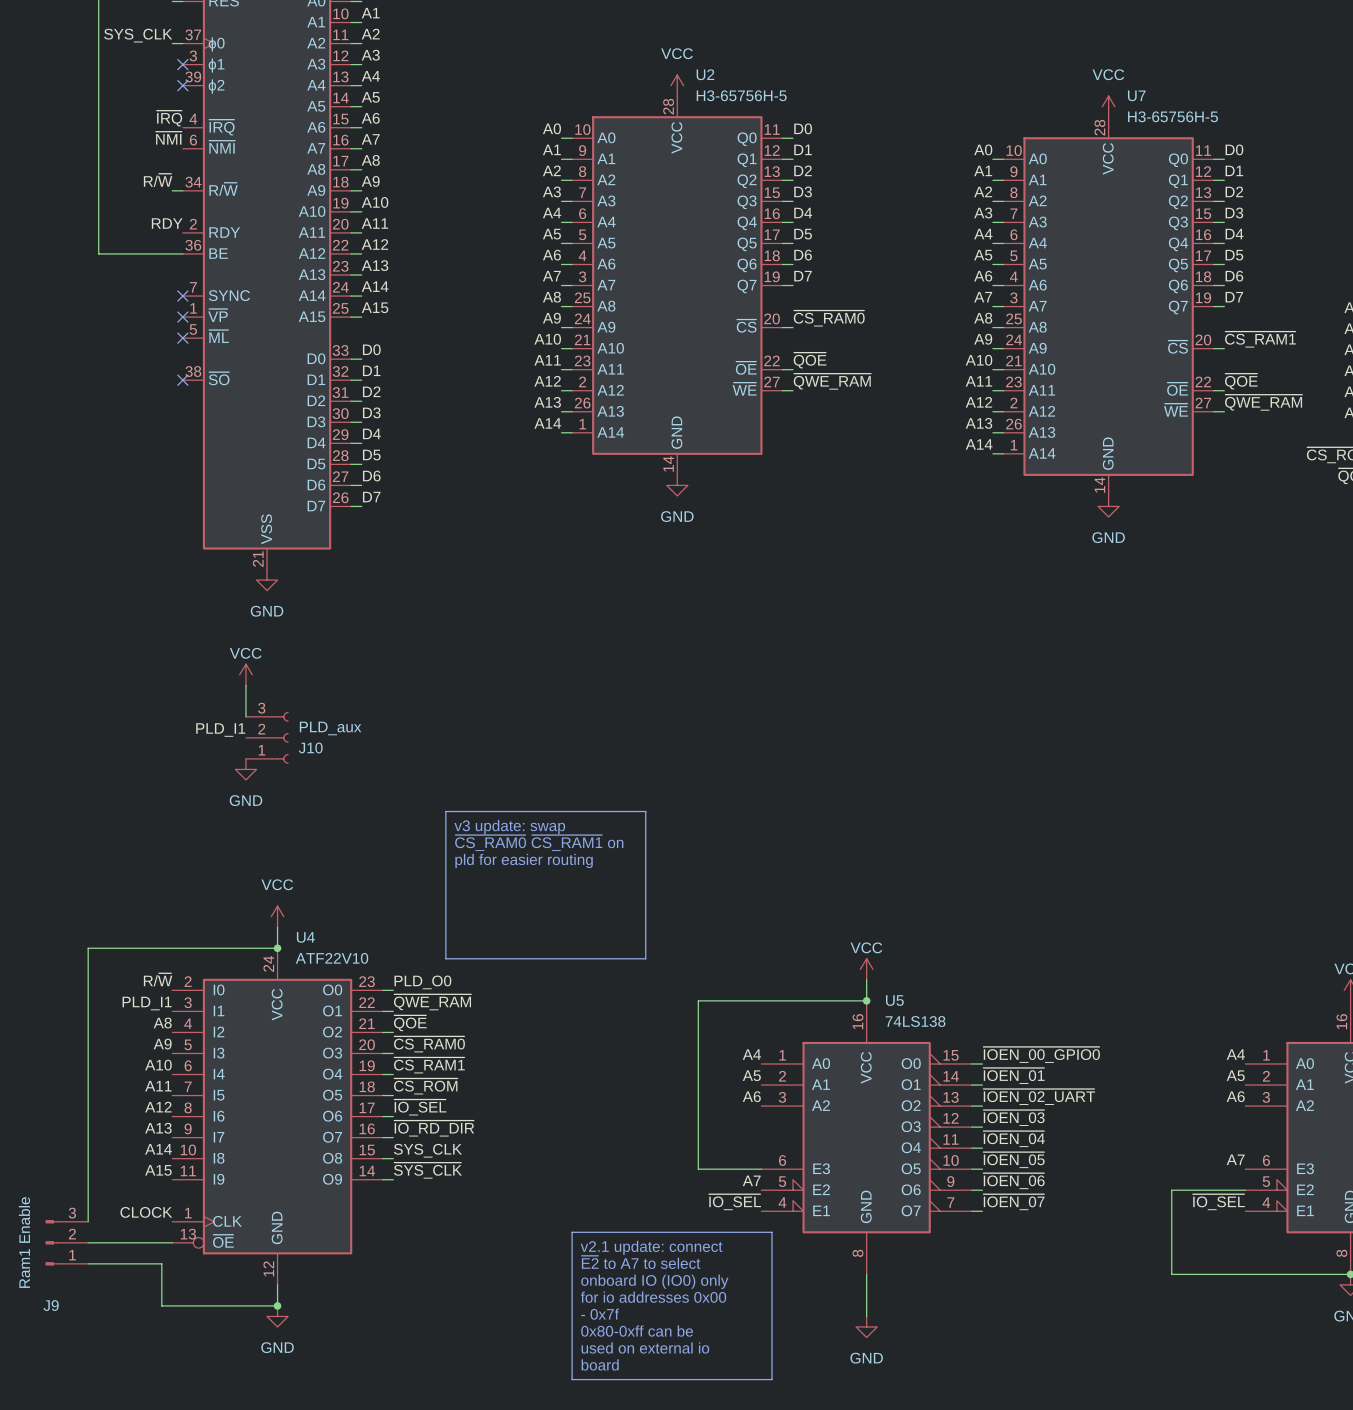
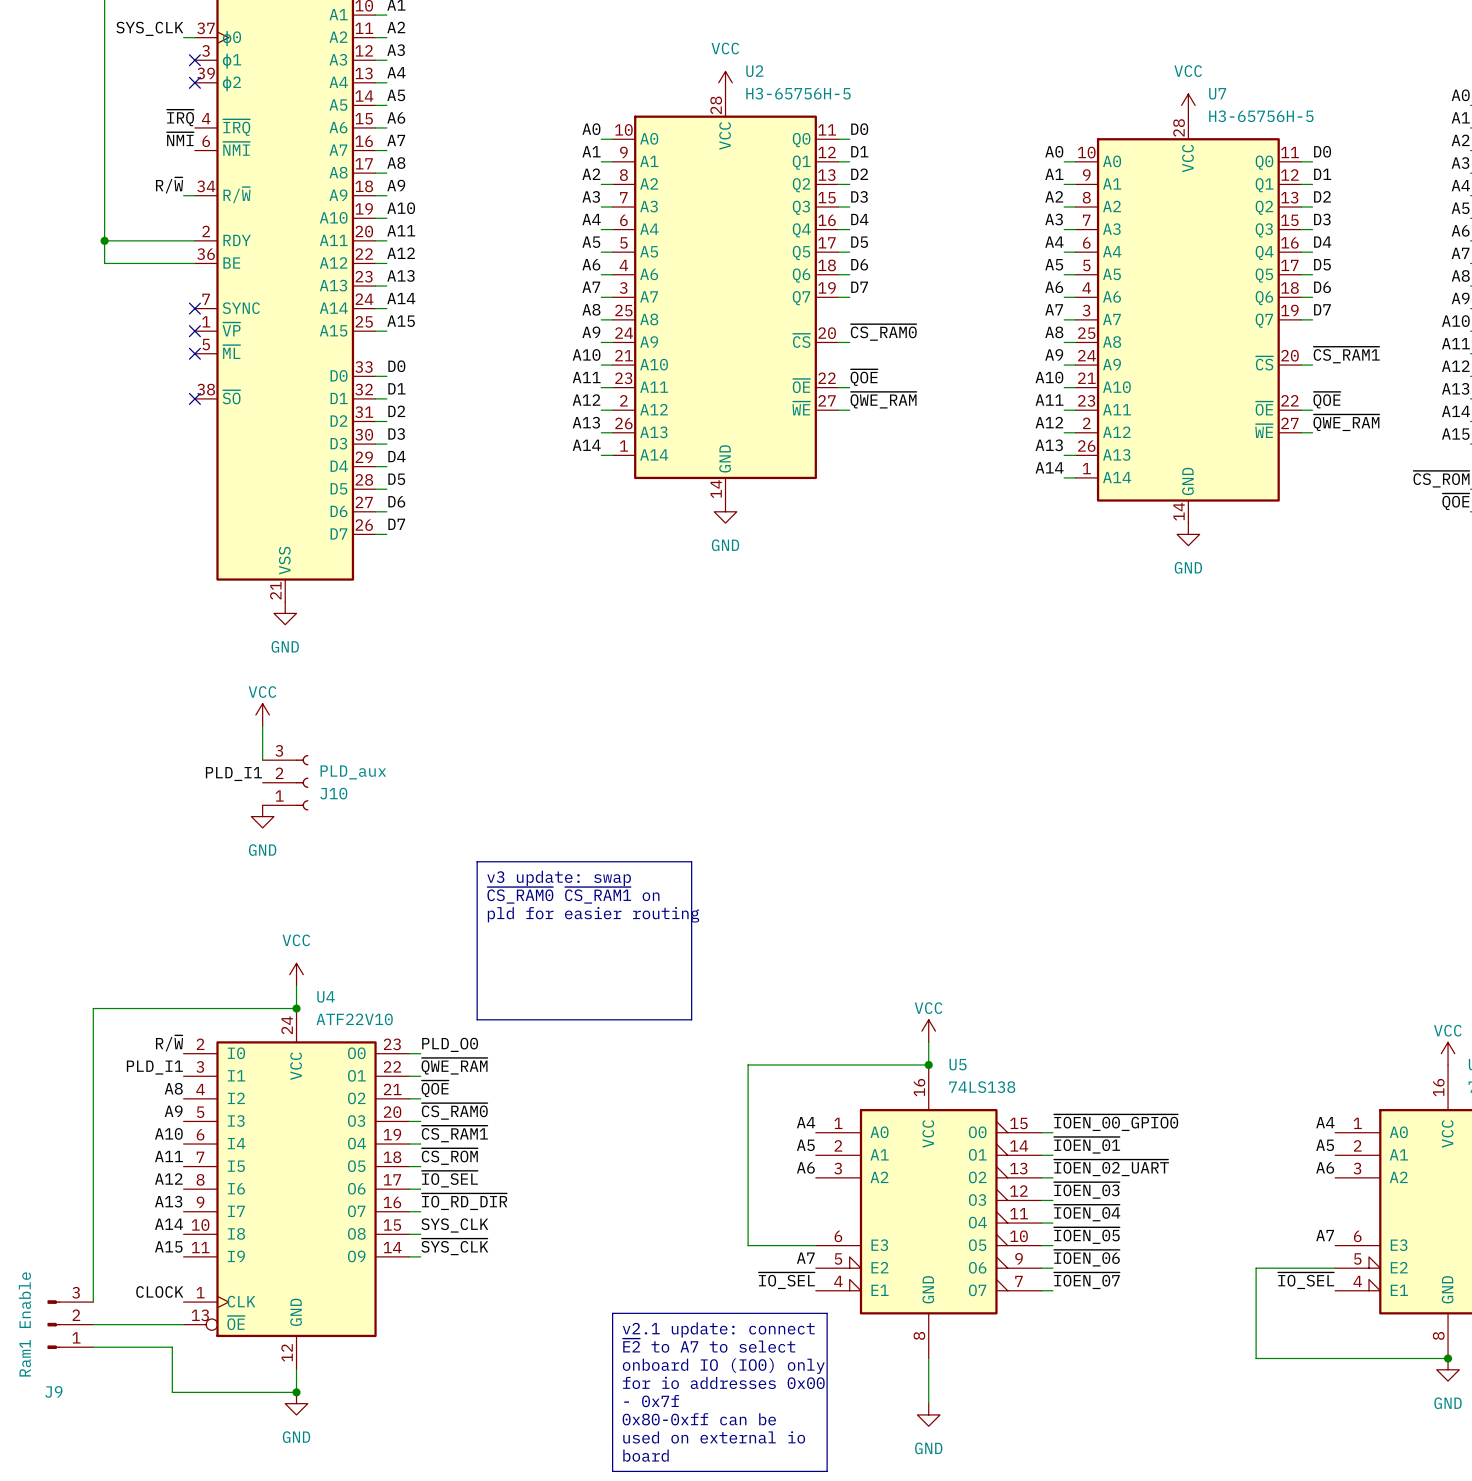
label: RDY (167, 223) -> none
wire: none -> (104, 240) (194, 240)
junction: none -> (104, 240)

